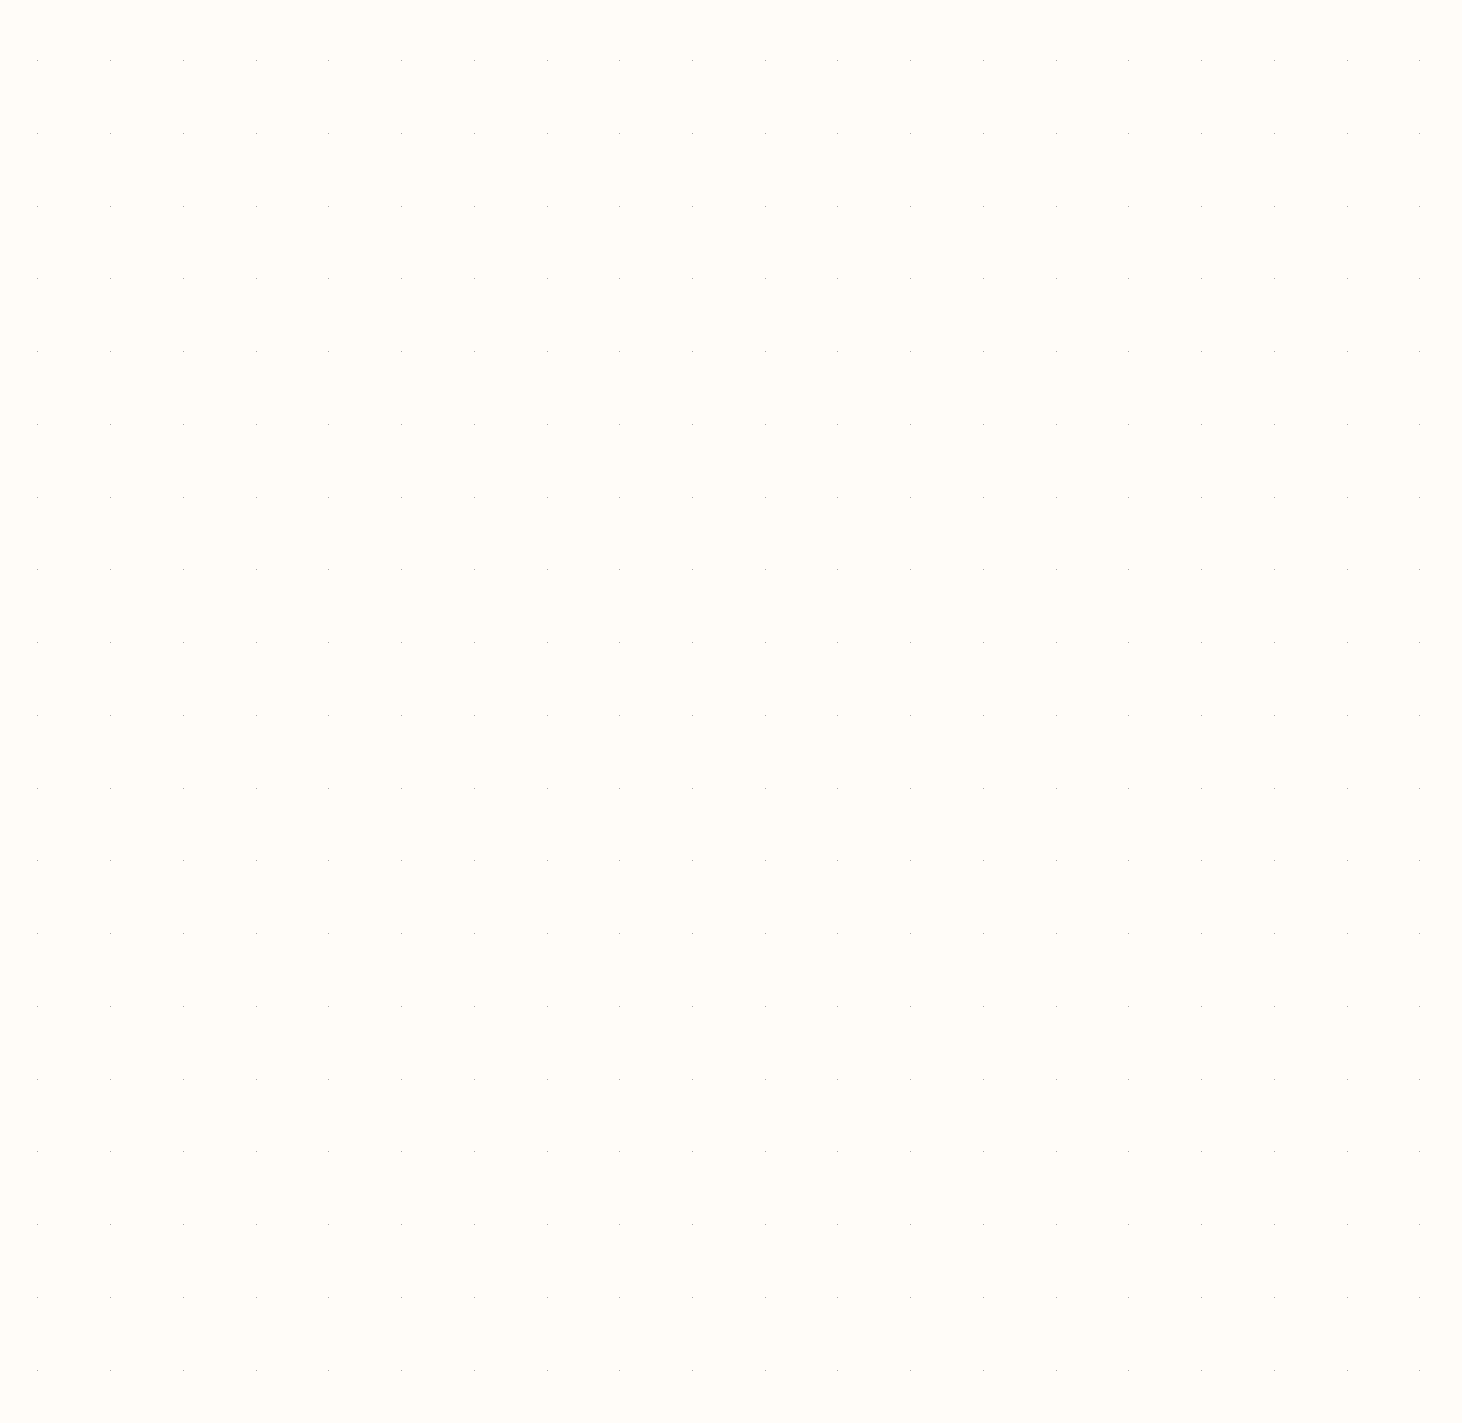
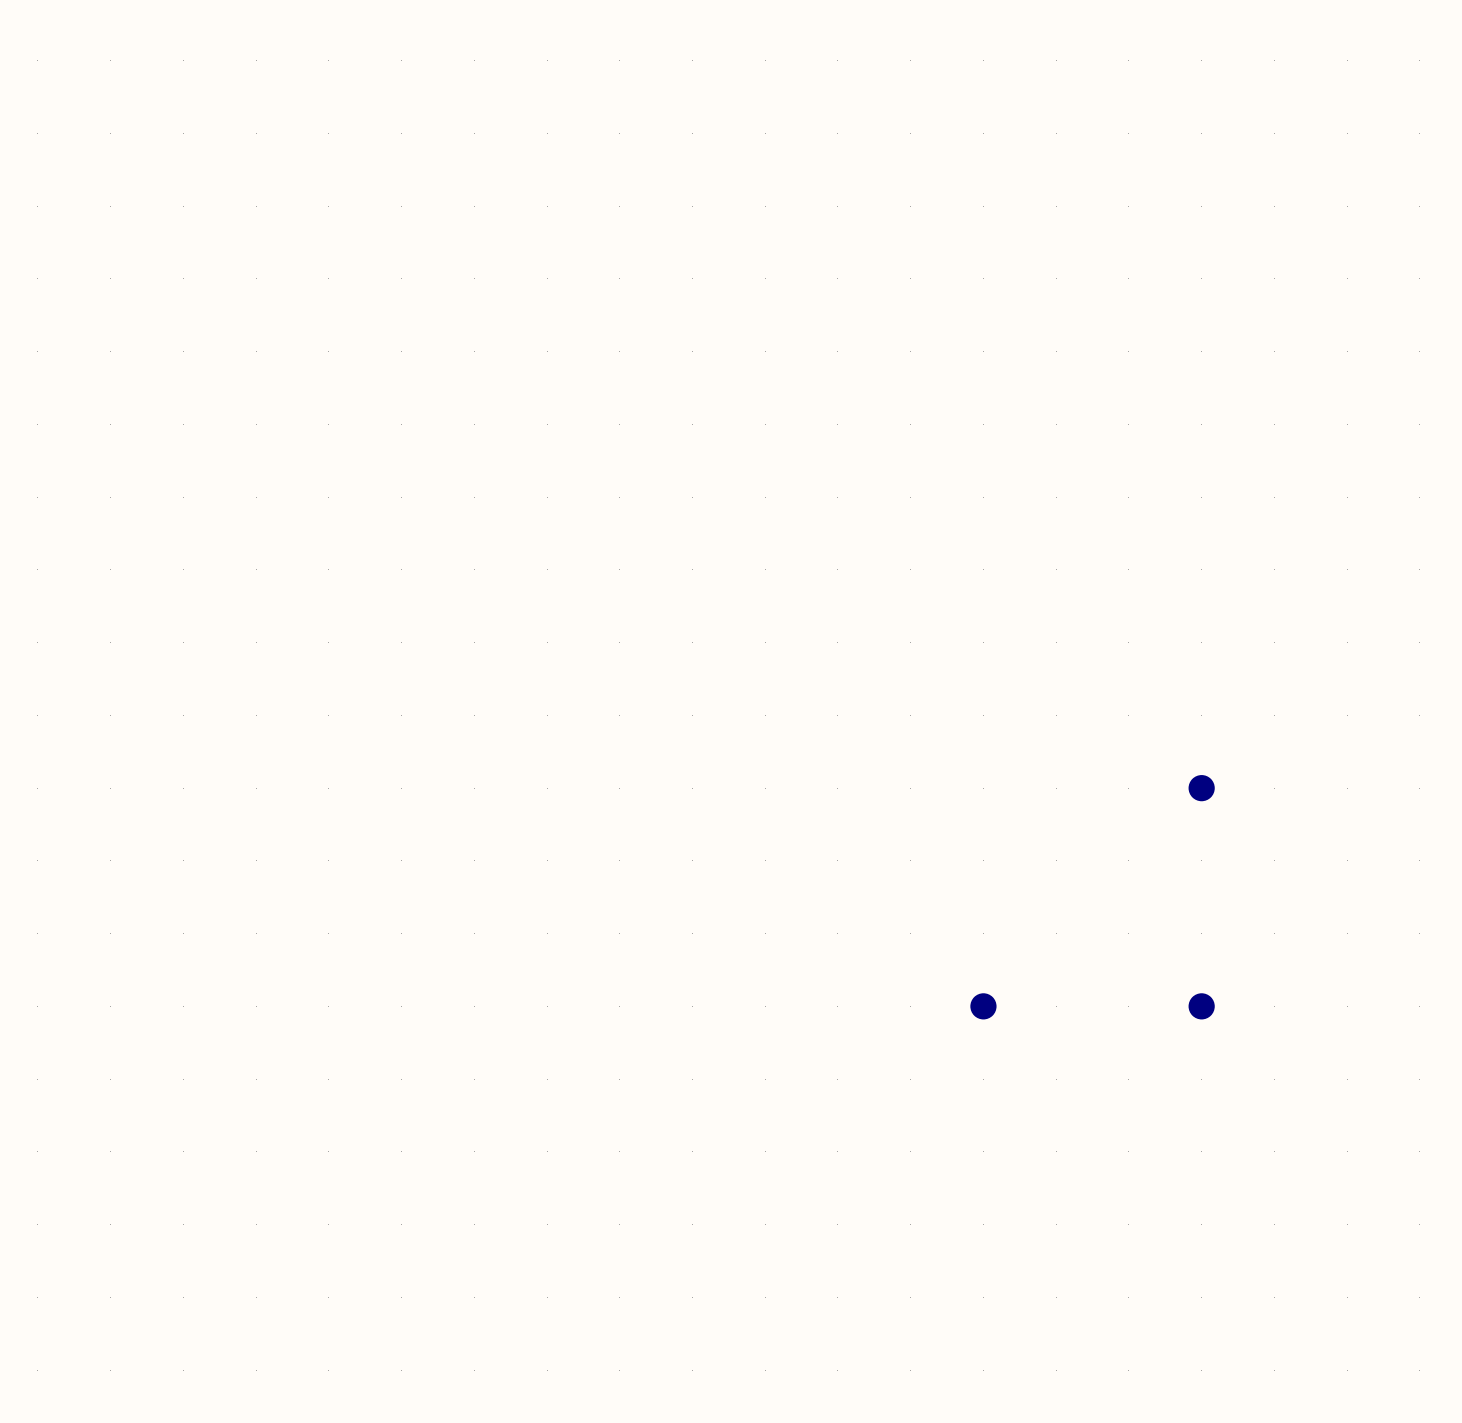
junction: none -> (1201, 788)
junction: none -> (983, 1006)
junction: none -> (1201, 1006)

